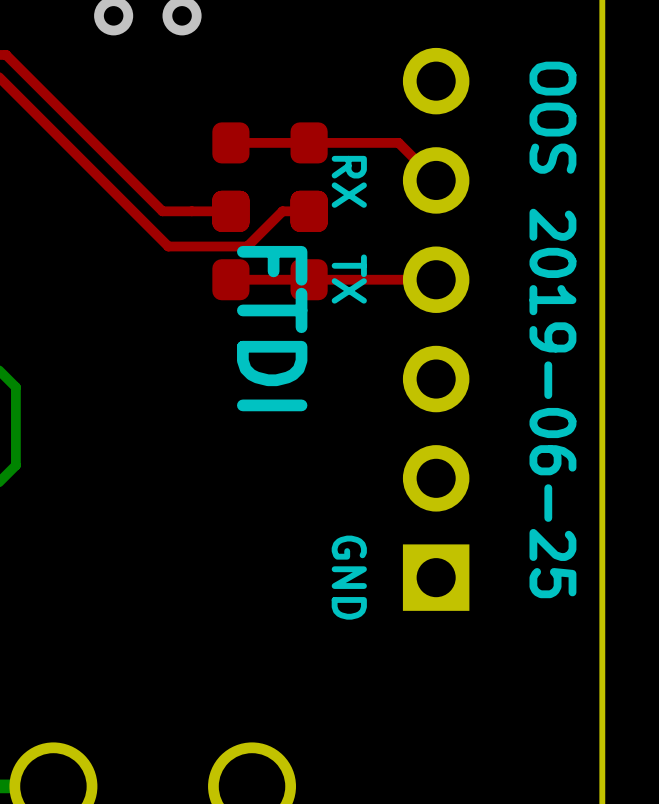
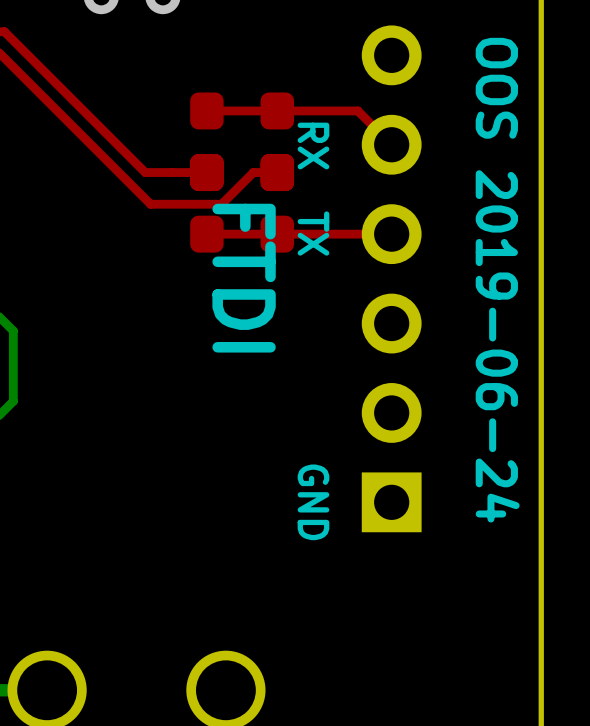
text: OOS 2019-06-25 (552, 329) -> OOS 2019-06-24 (497, 280)

